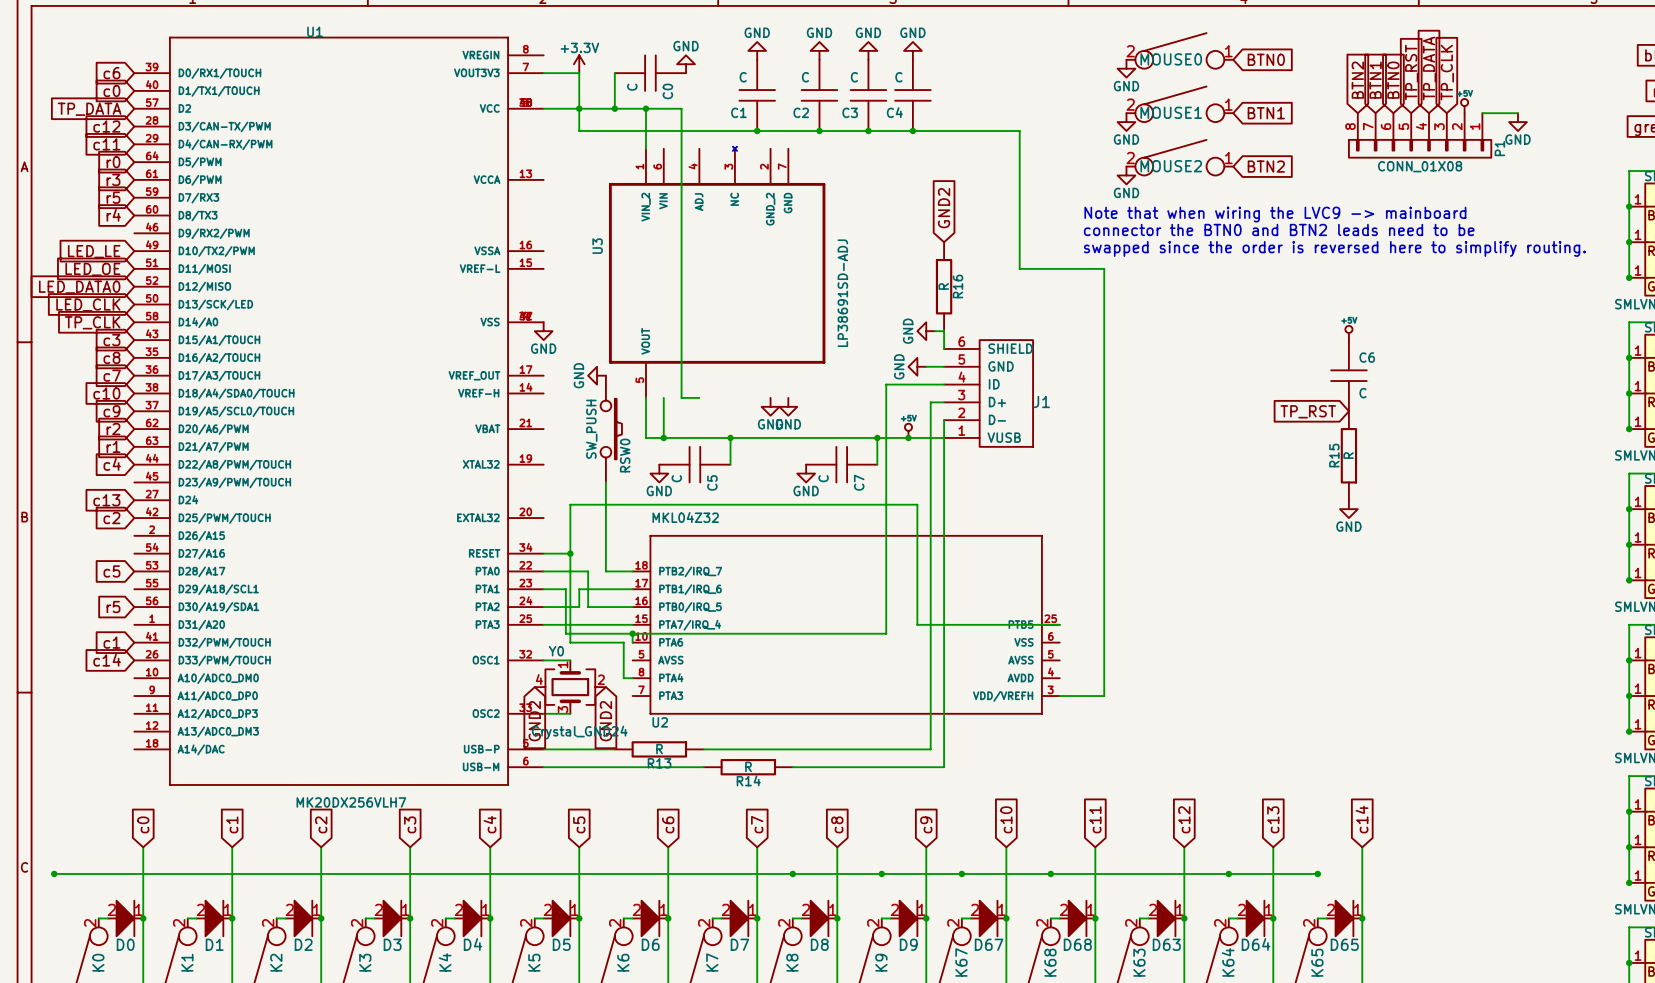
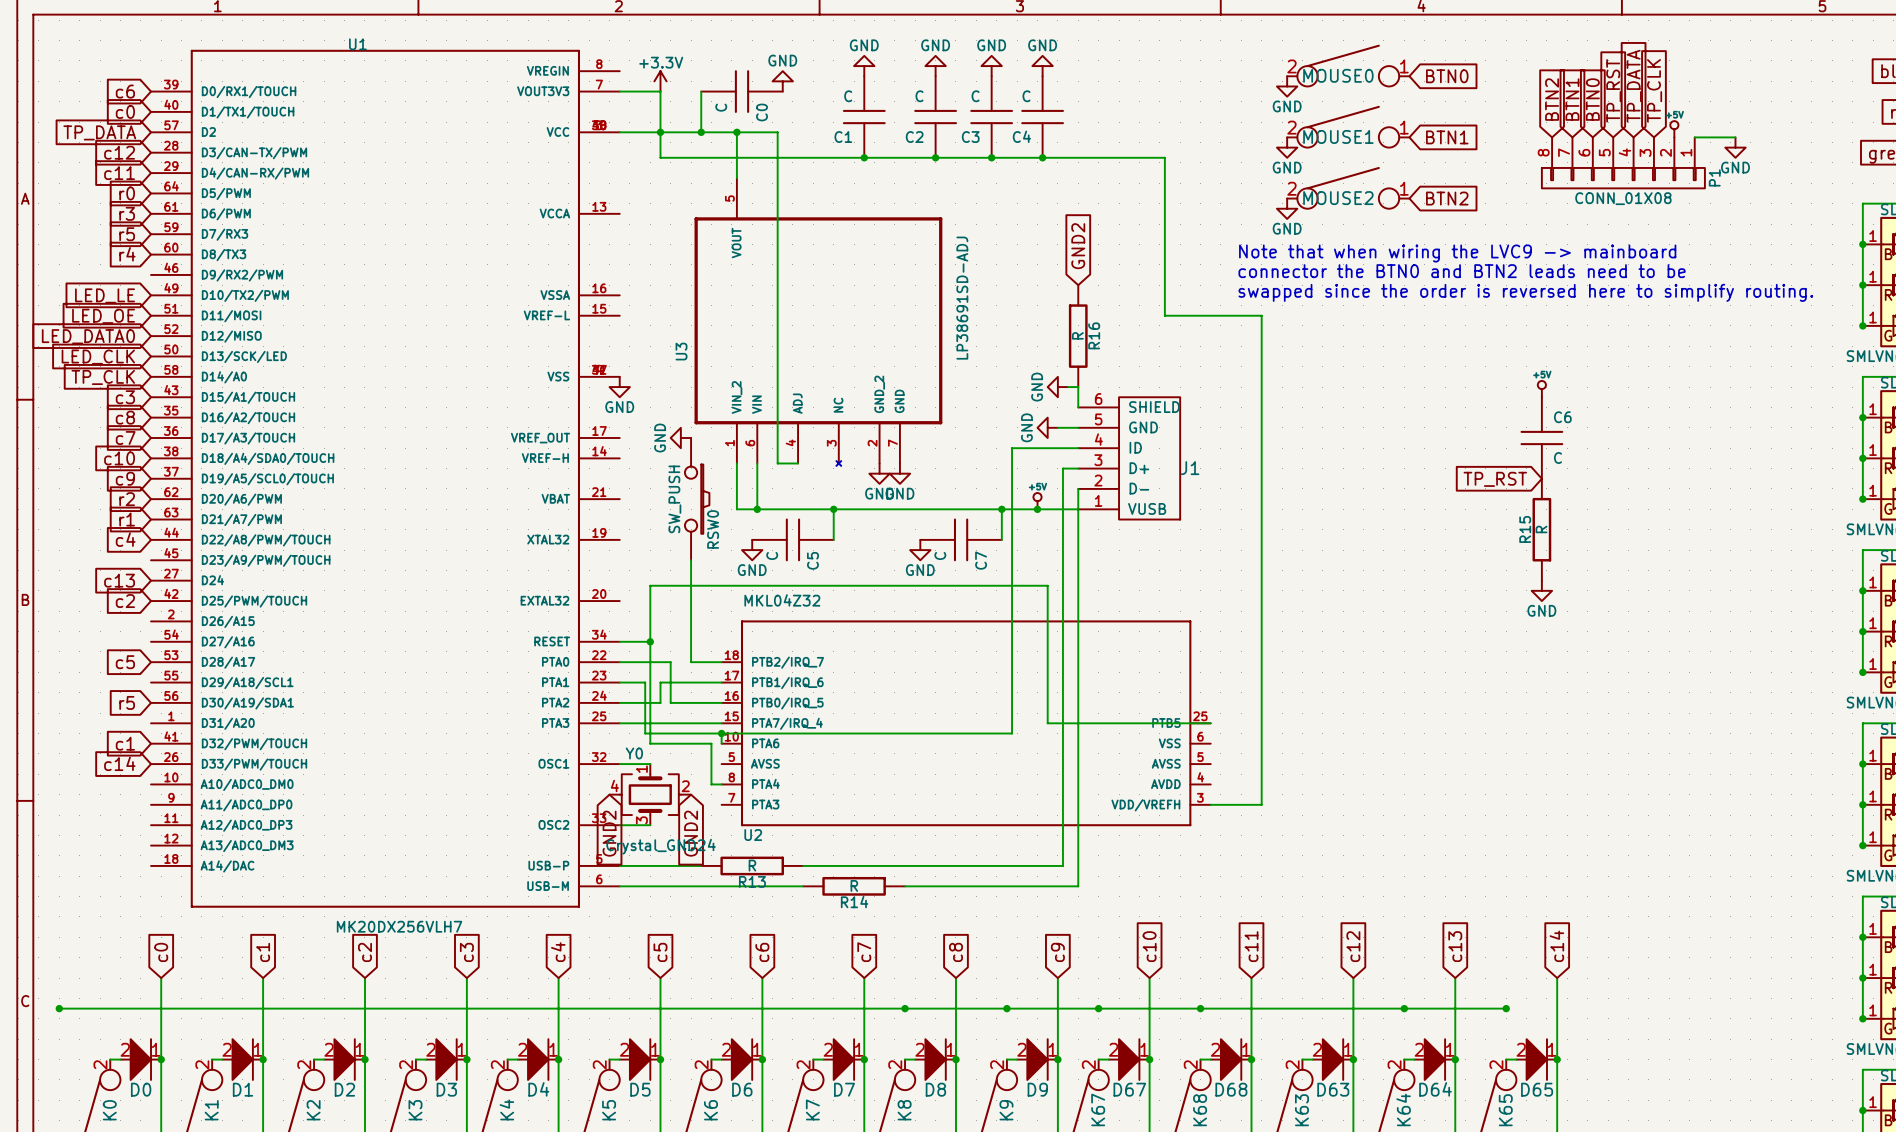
U3 flip: as is (717, 255) -> up-down (818, 341)

